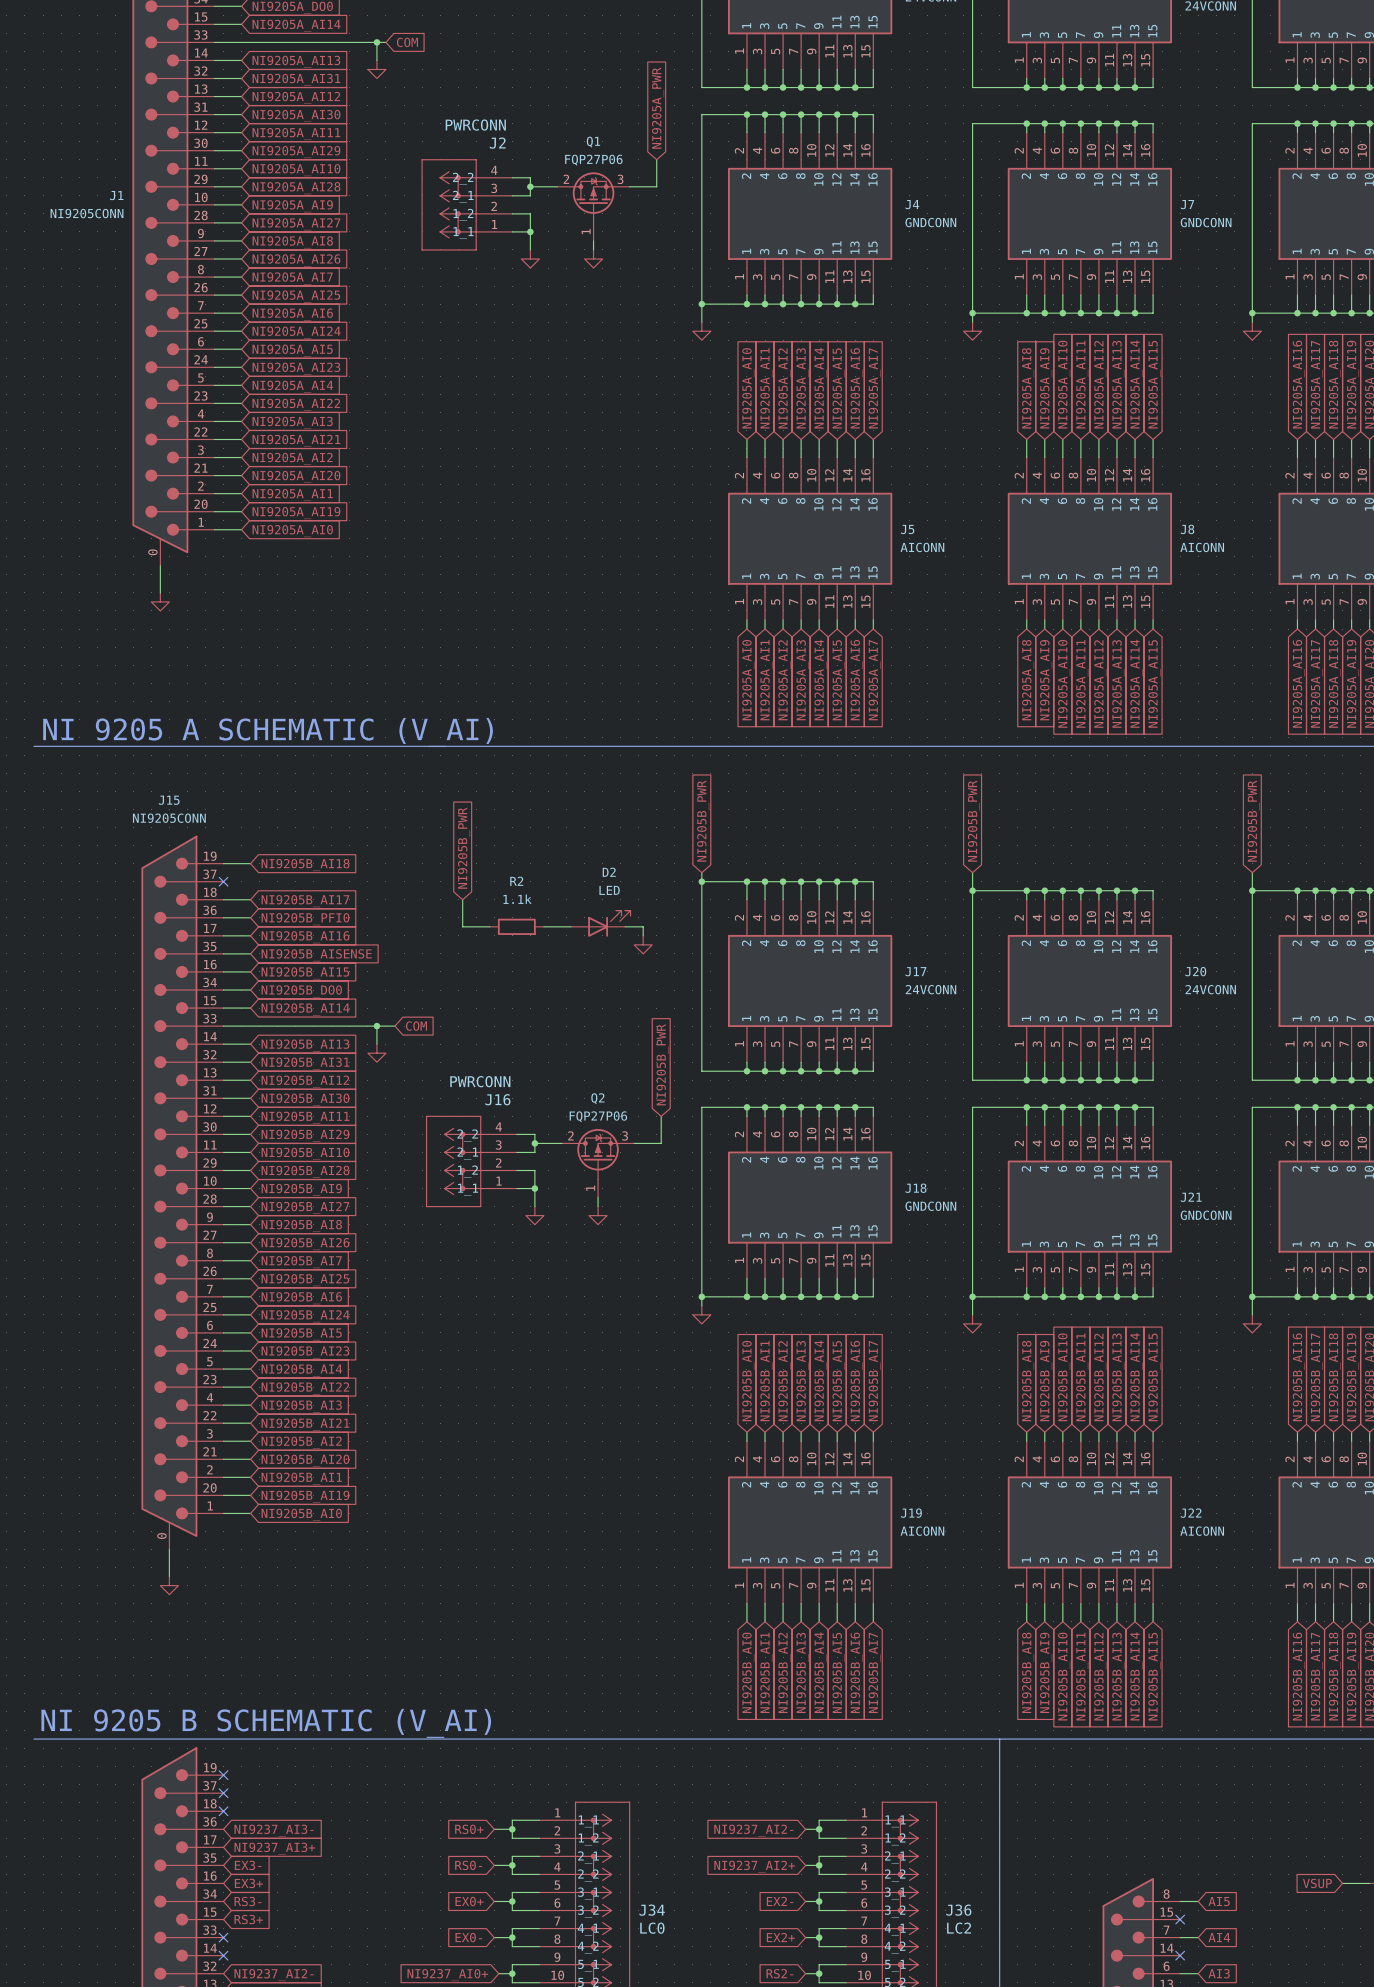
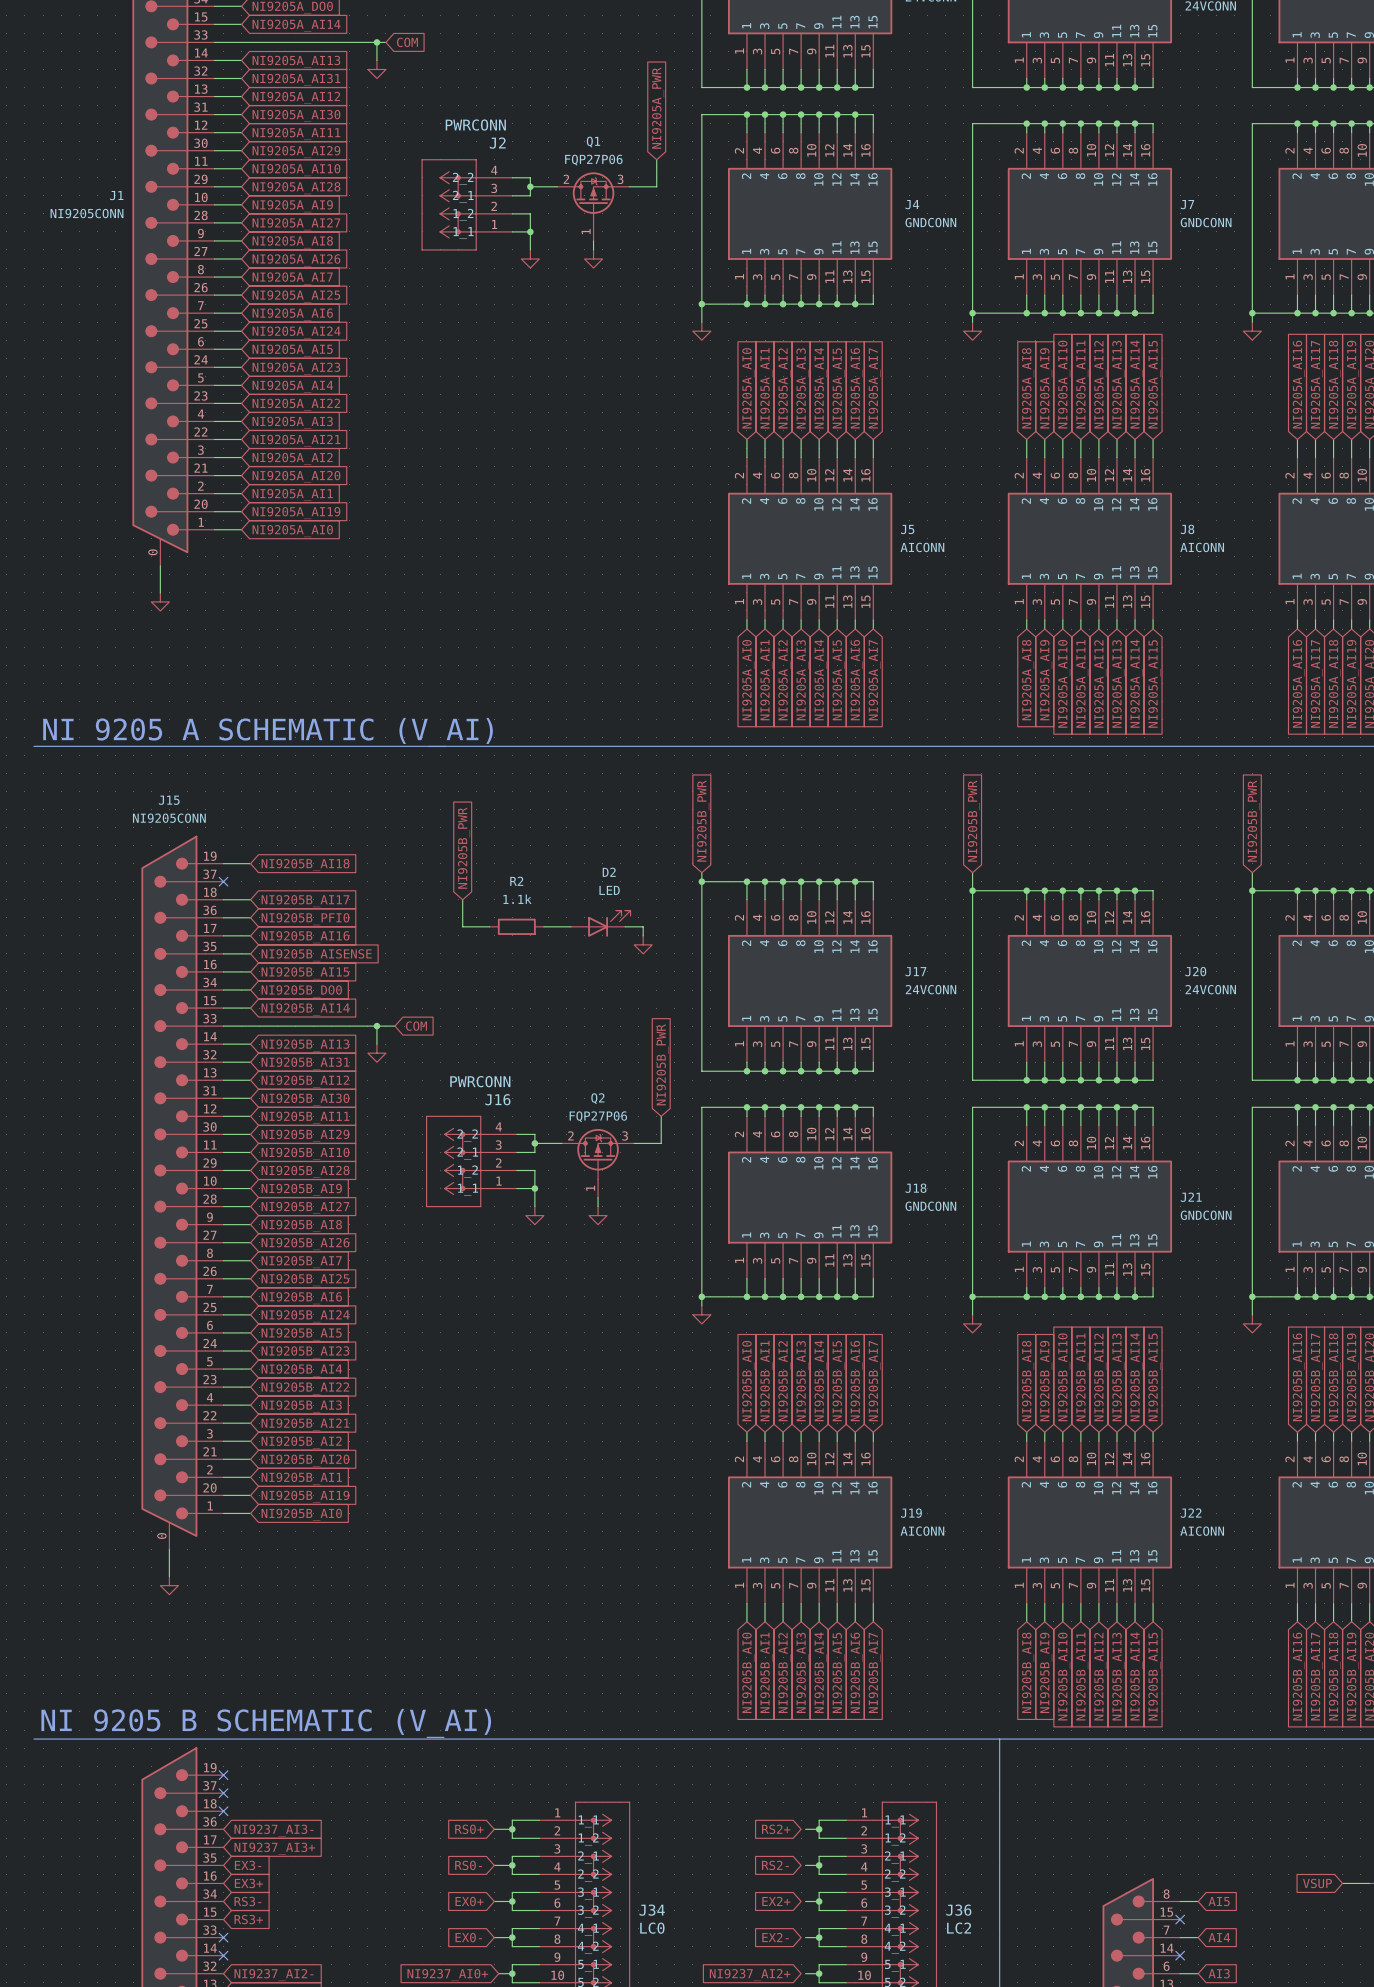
global label: NI9237_AI2- (753, 1830) -> RS2+ (776, 1829)
global label position: NI9237_AI2+ (754, 1866) -> NI9237_AI2+ (750, 1975)
global label position: EX2- (780, 1901) -> EX2- (775, 1937)
global label position: EX2+ (780, 1937) -> EX2+ (776, 1901)
global label position: RS2- (779, 1973) -> RS2- (775, 1865)

